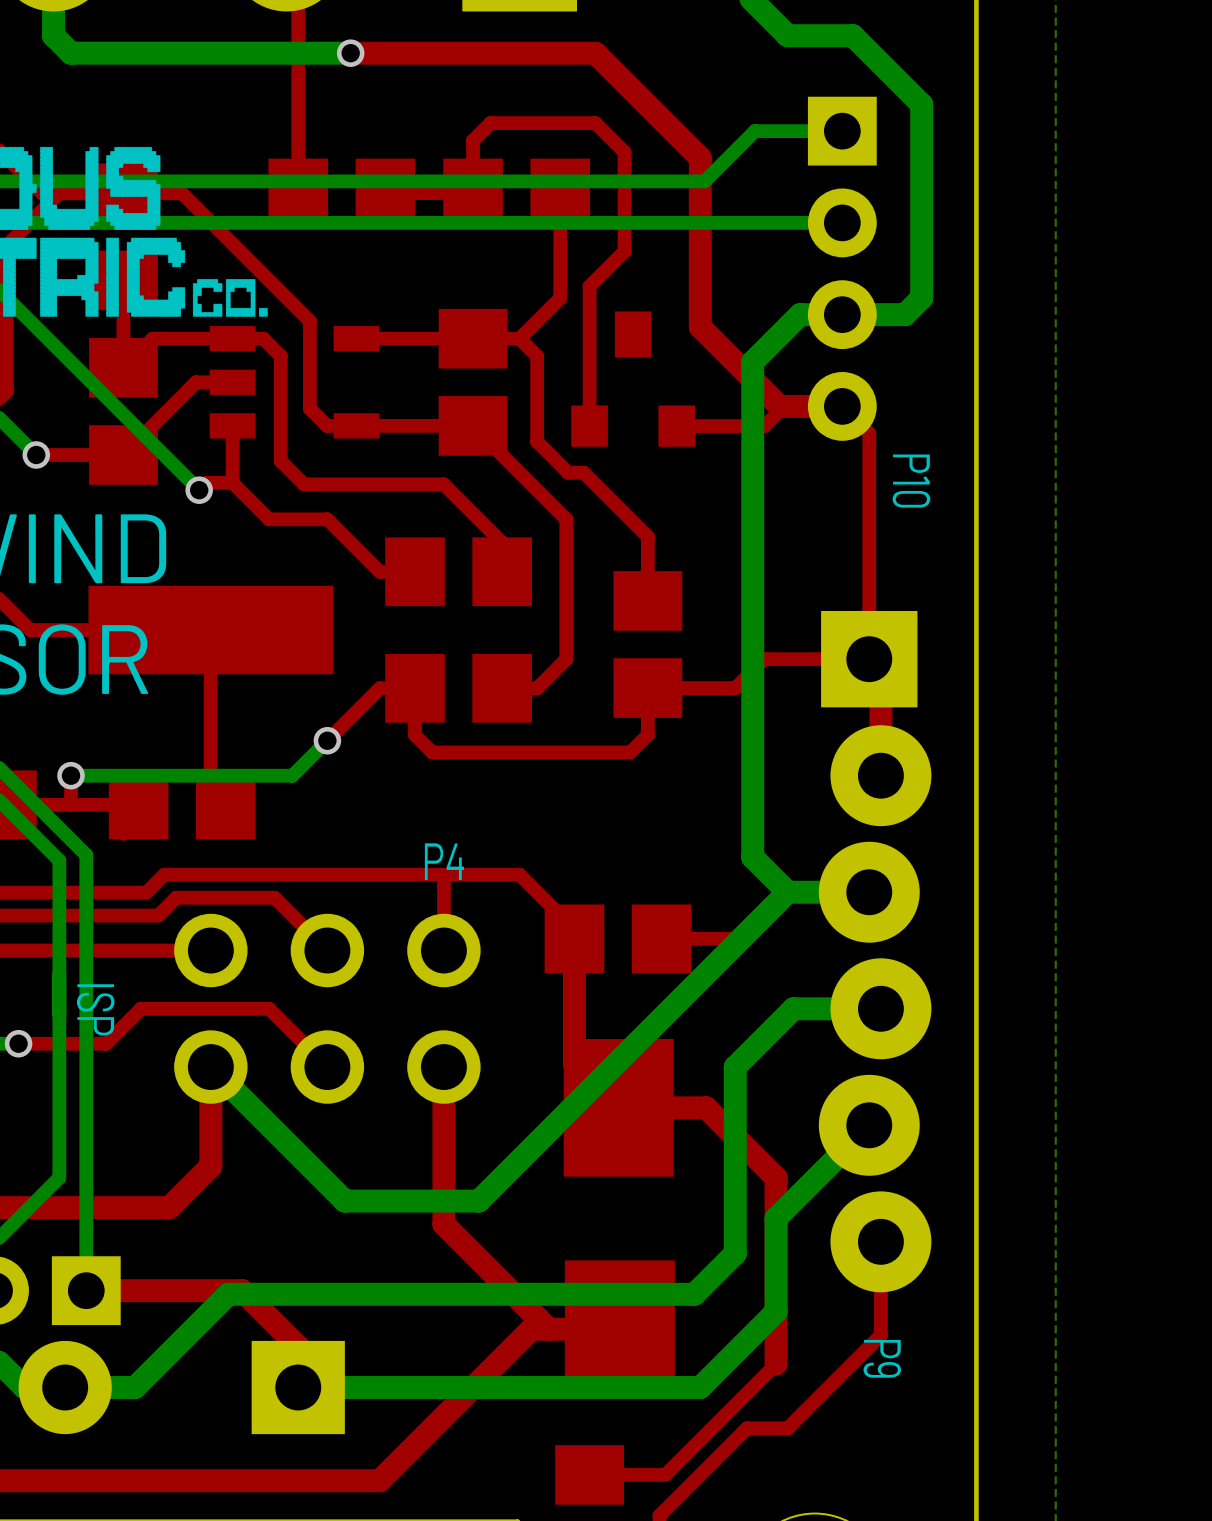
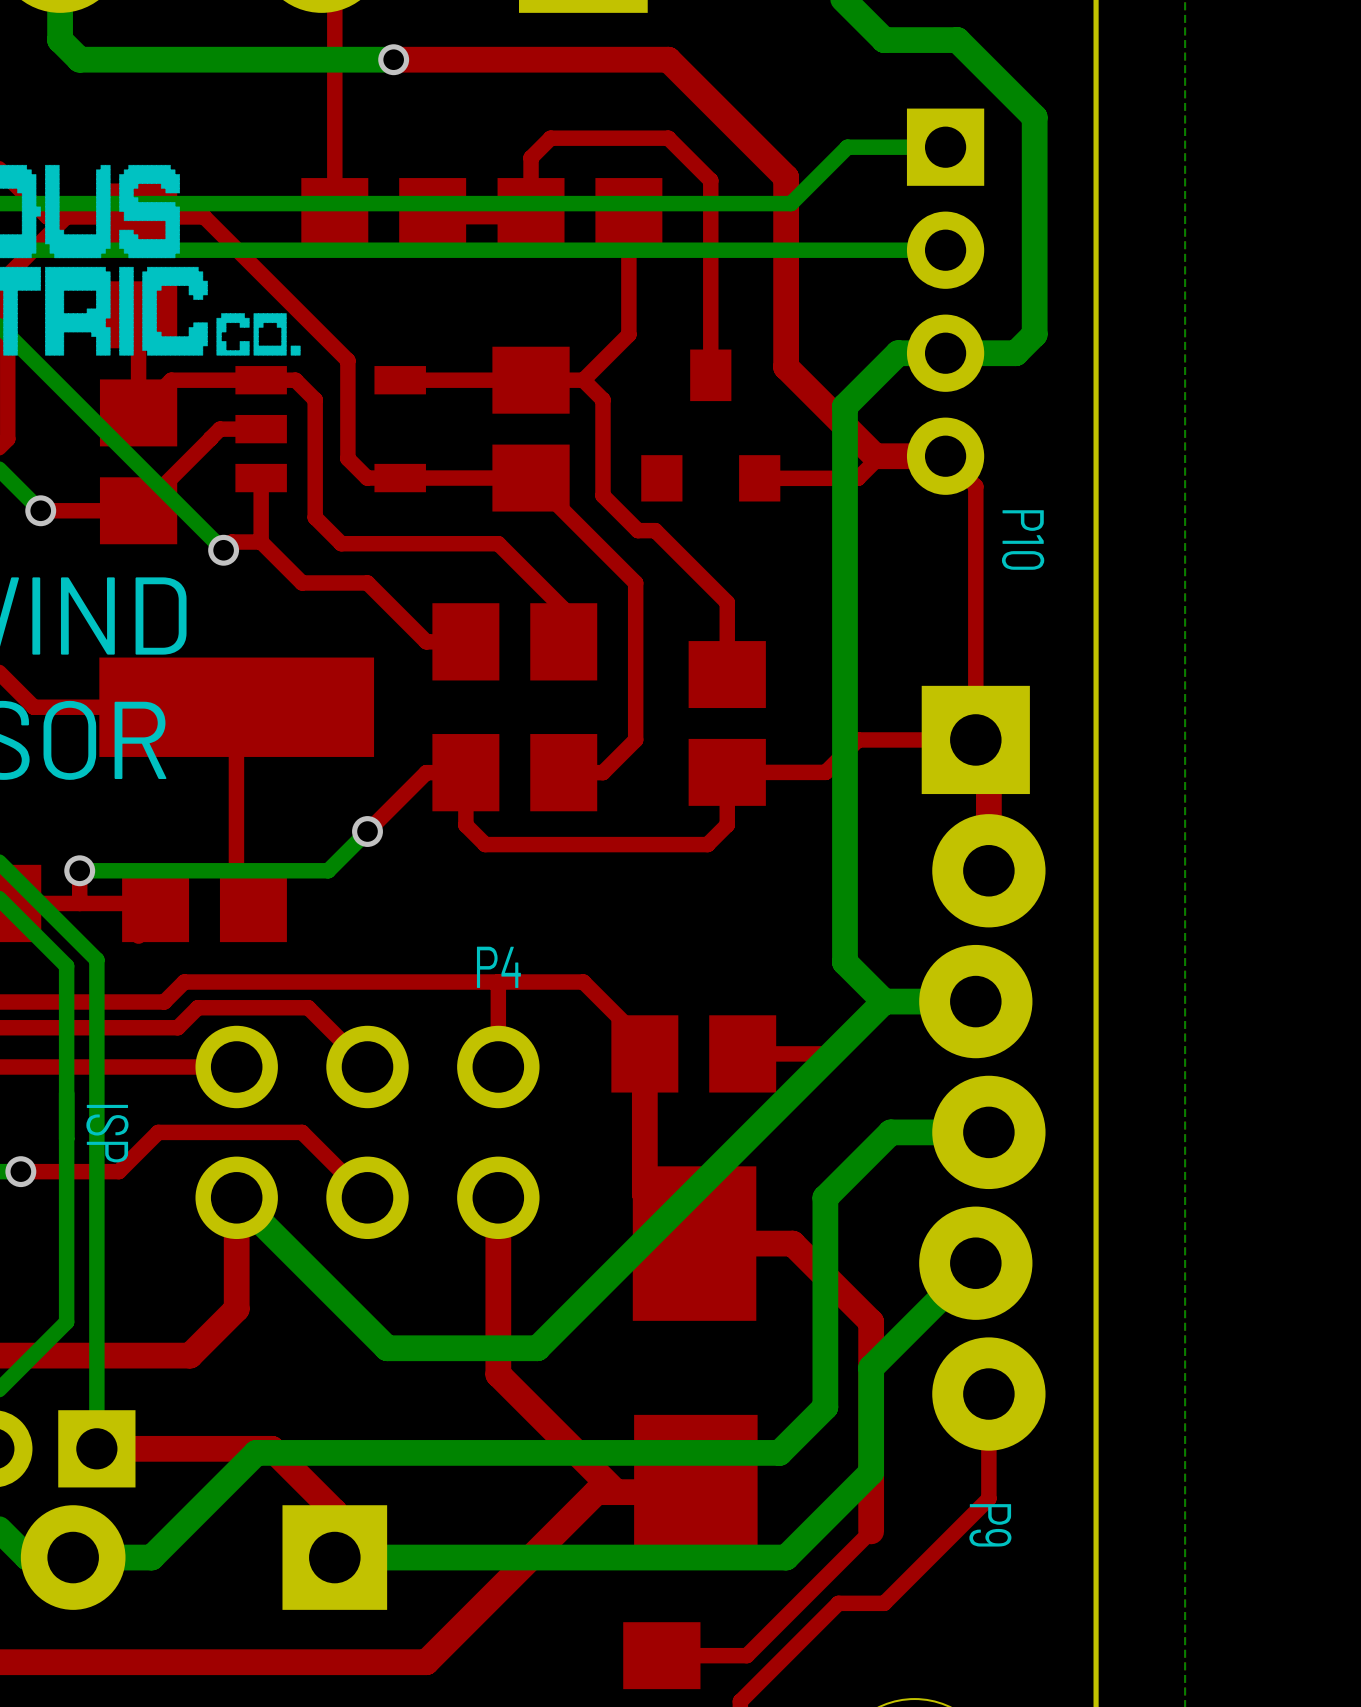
top track: (624, 152) (624, 251) (589, 286) (589, 426) -> (701, 170) (710, 180) (710, 375)

